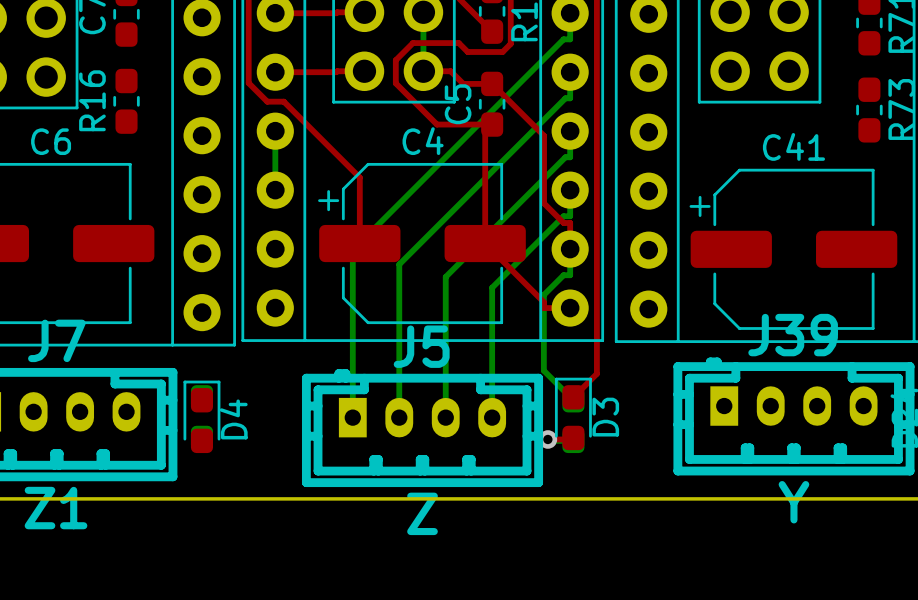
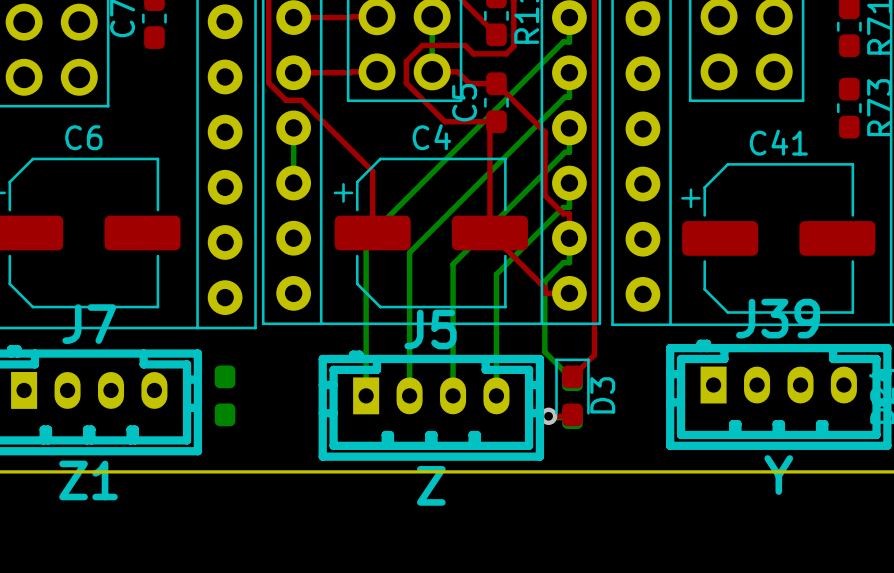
R16: (126, 101) -> none
D4: (201, 416) -> none

